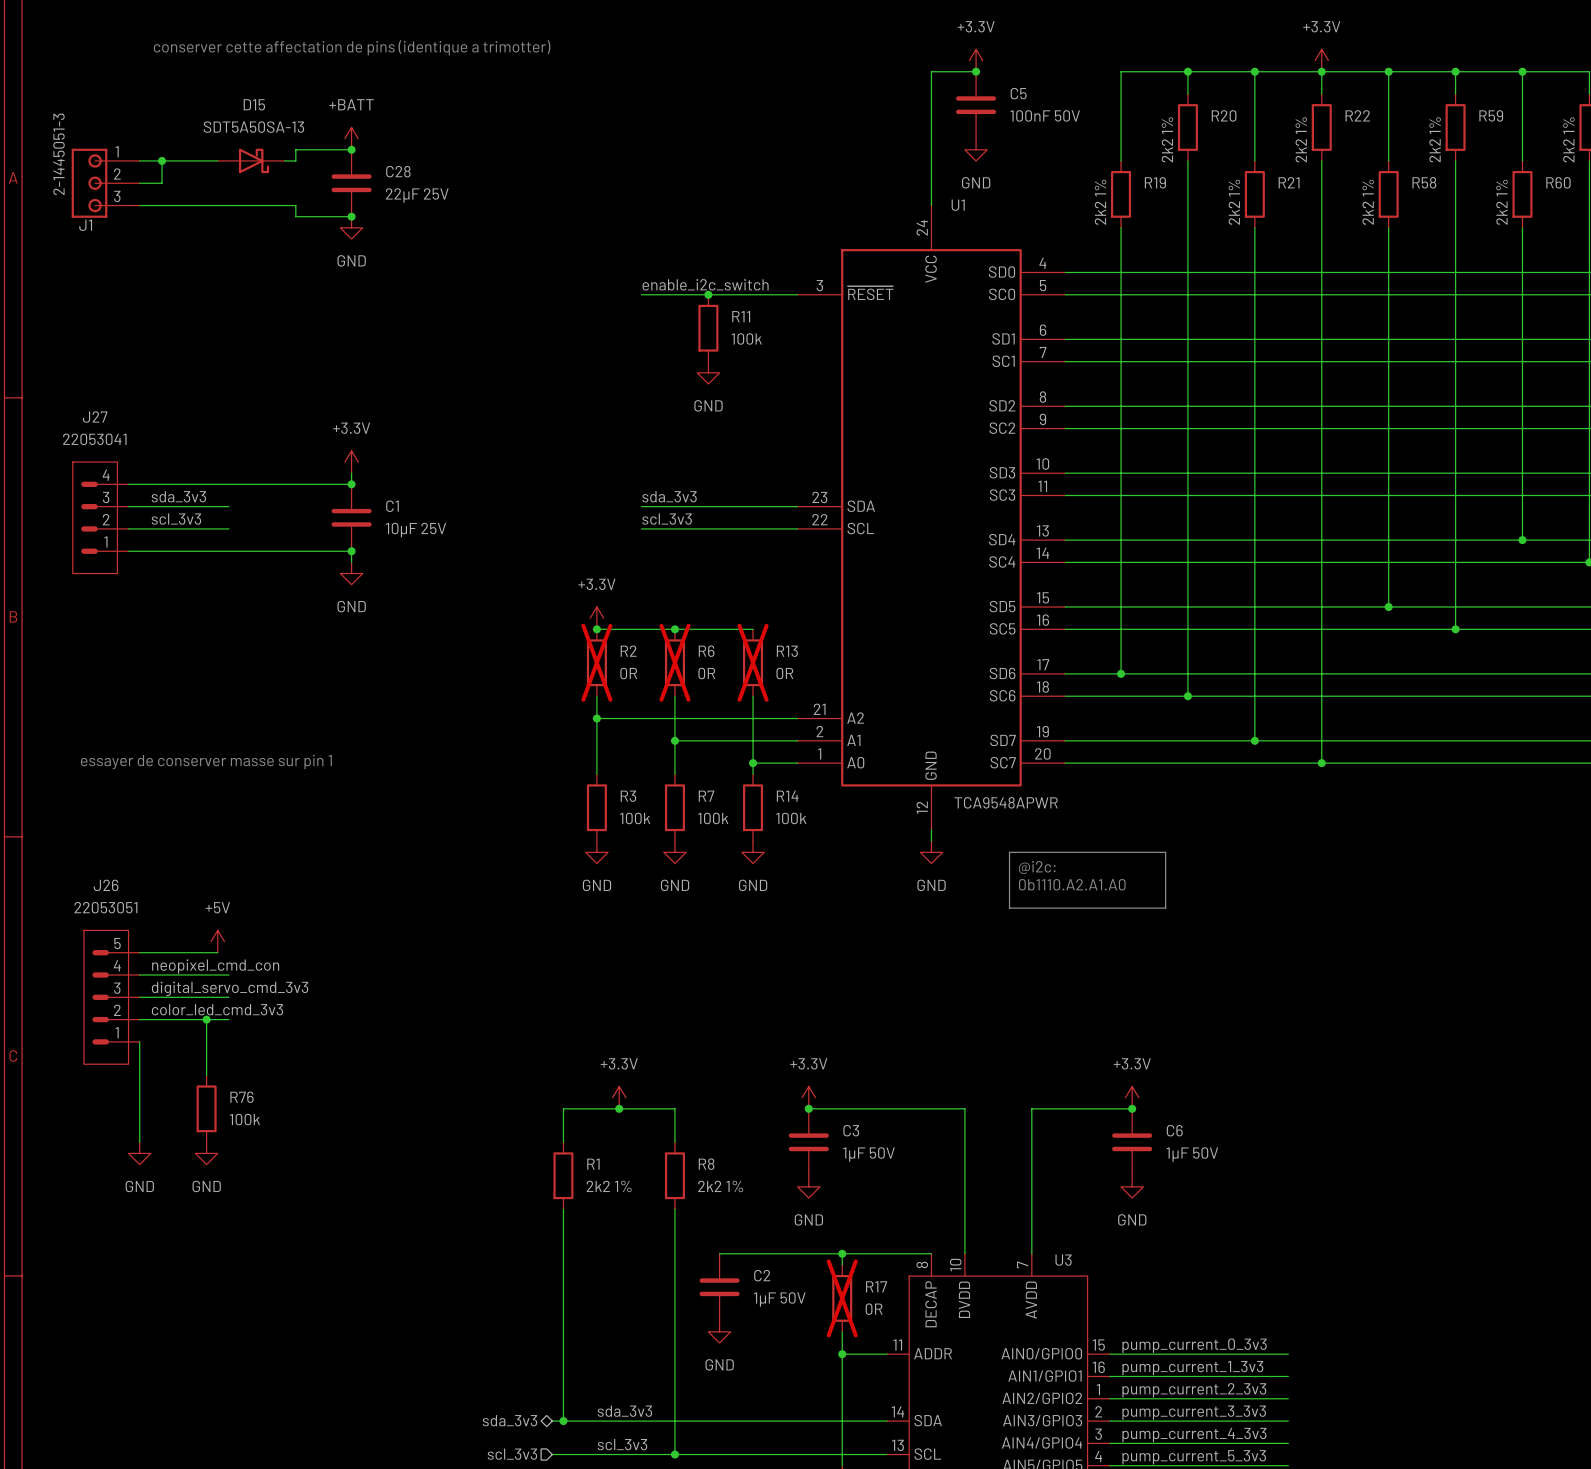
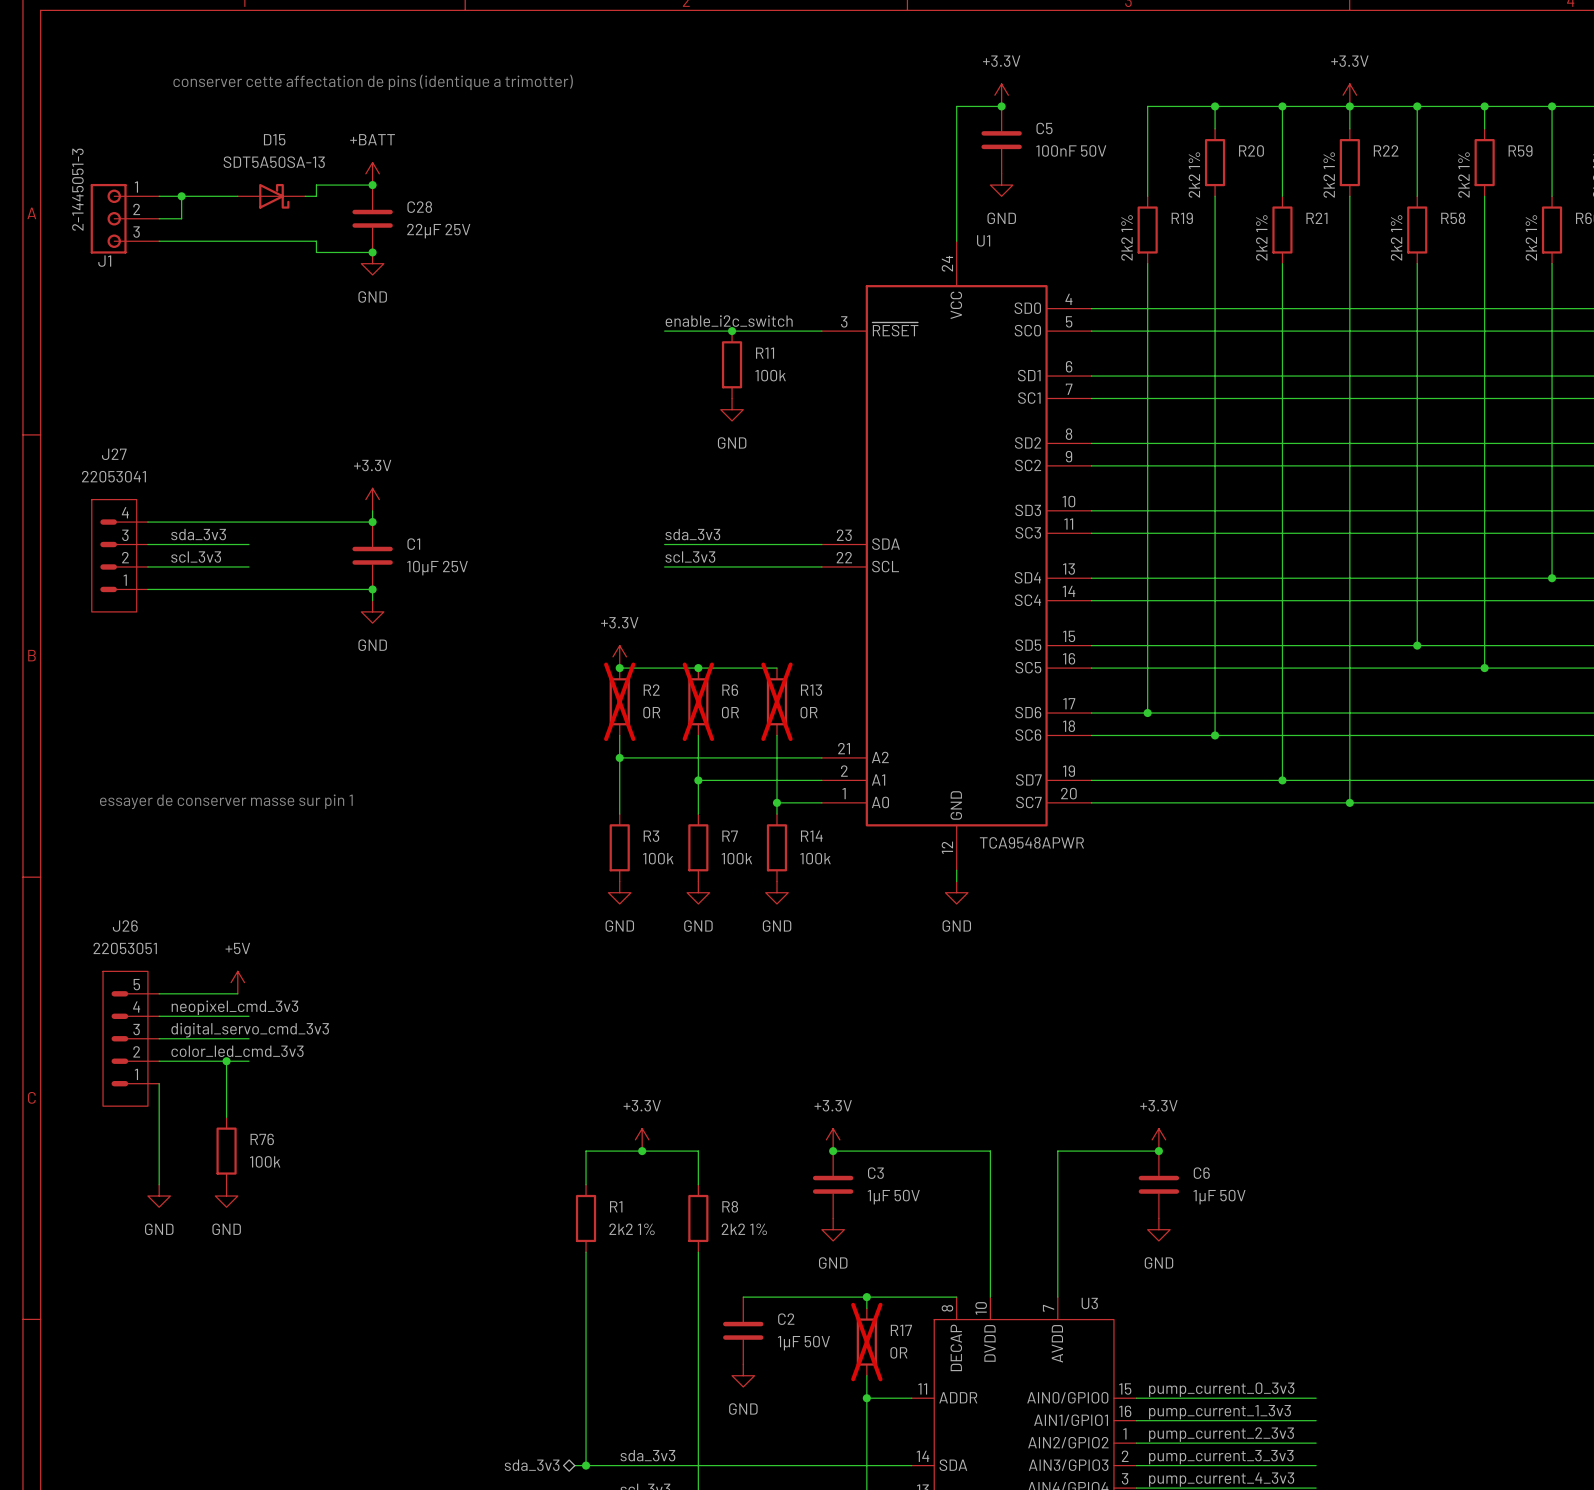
line: (1009, 852) (1165, 852) (1165, 908) (1009, 908) (1009, 852) -> none
text: @i2c: (1037, 867) -> none
text: 0b1110.A2.A1.A0 (1072, 884) -> none
label: neopixel_cmd_con (215, 966) -> neopixel_cmd_3v3 (234, 1007)

